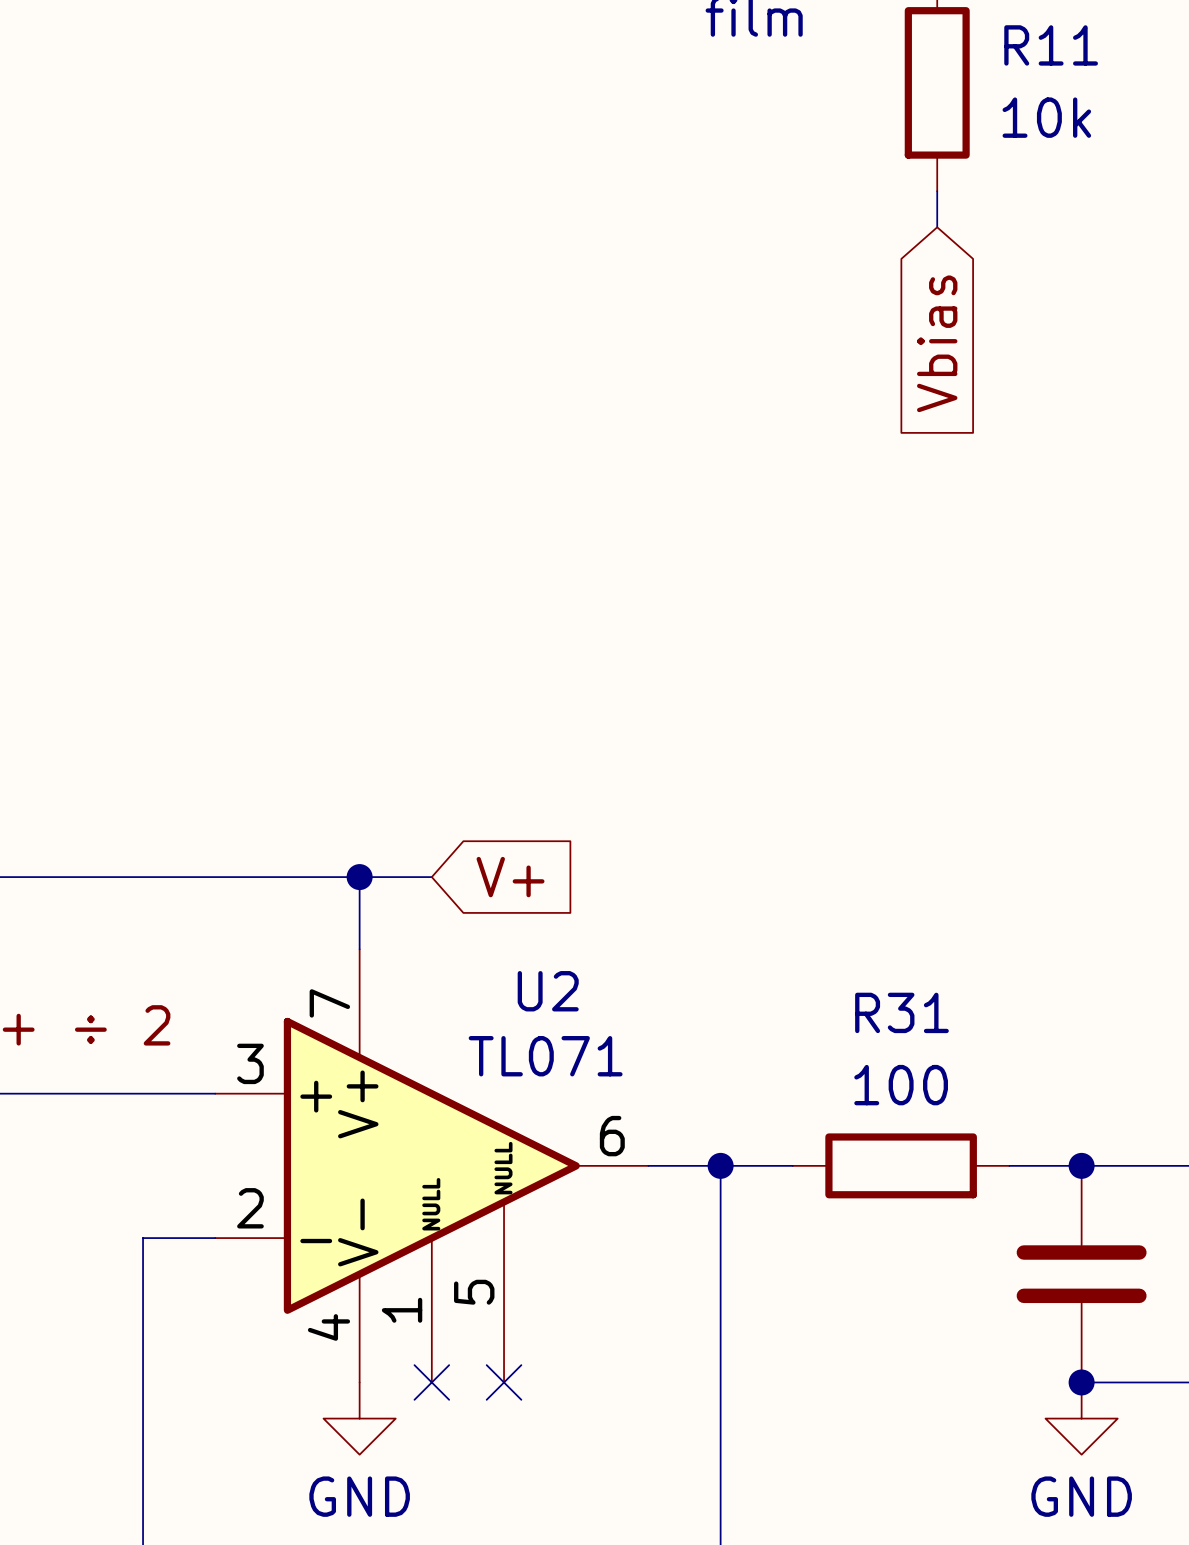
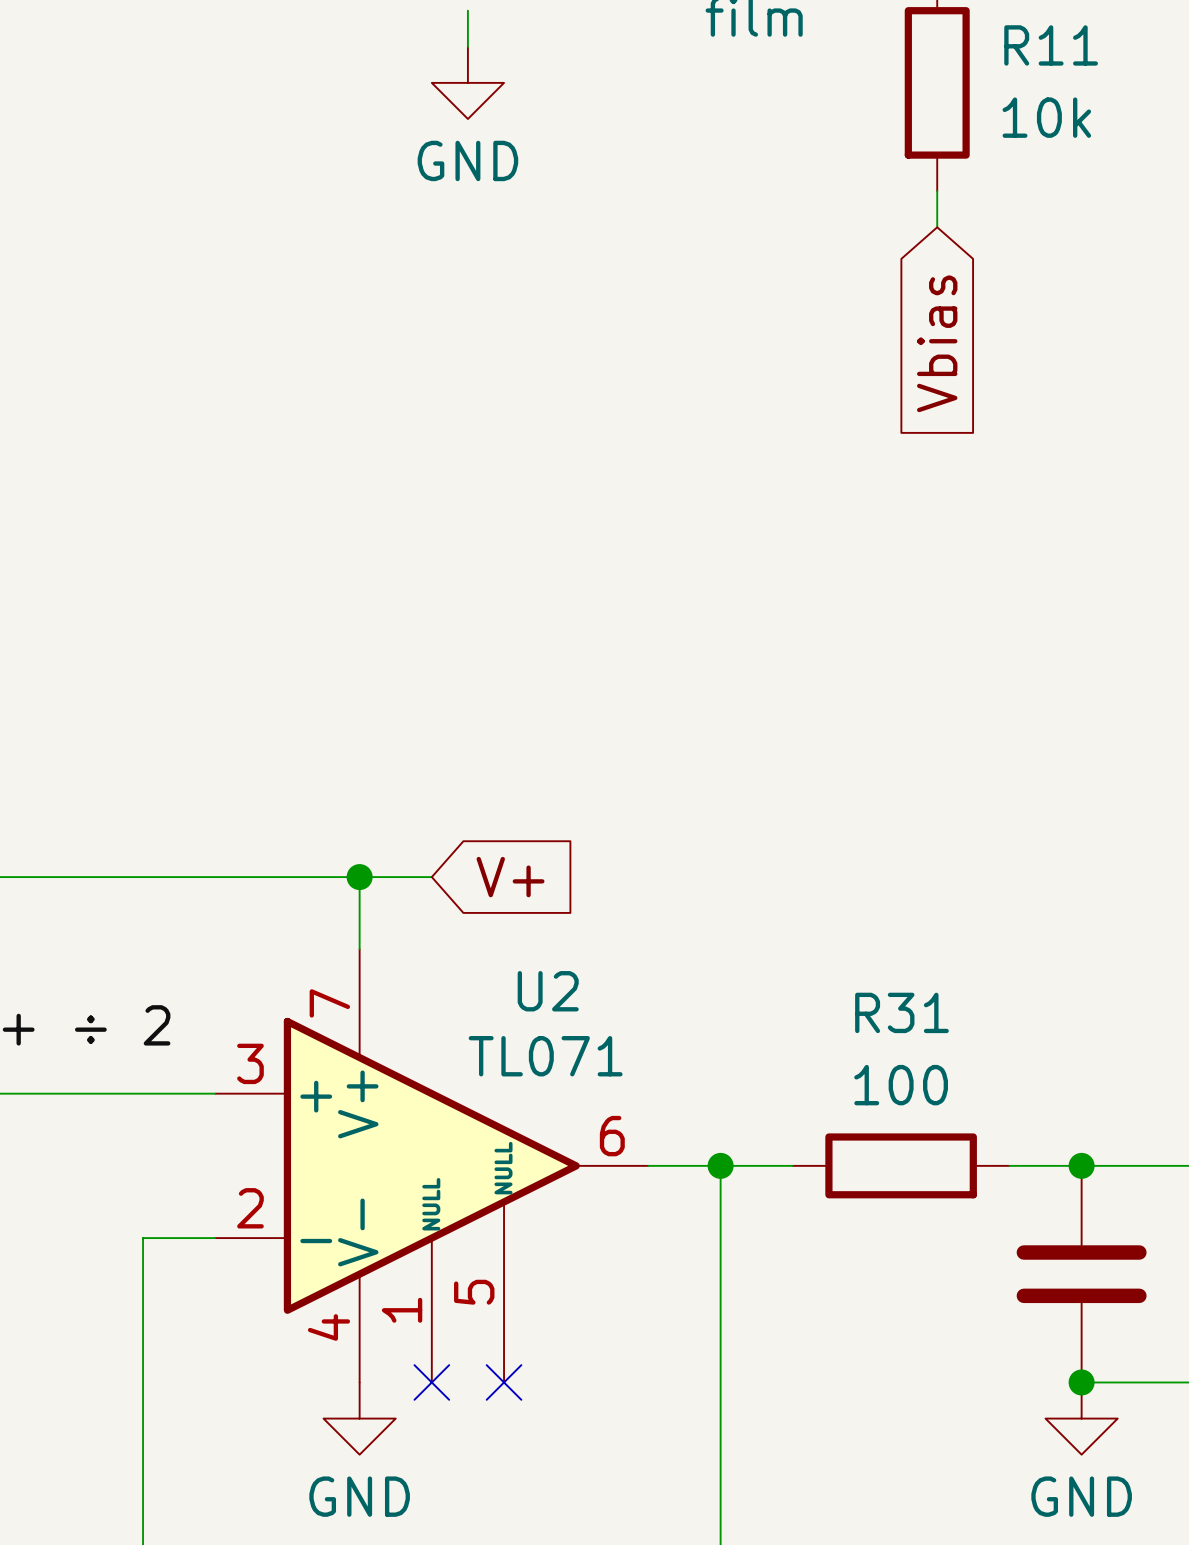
wire: none -> (467, 10) (467, 46)
power symbol: none -> GND (467, 82)

